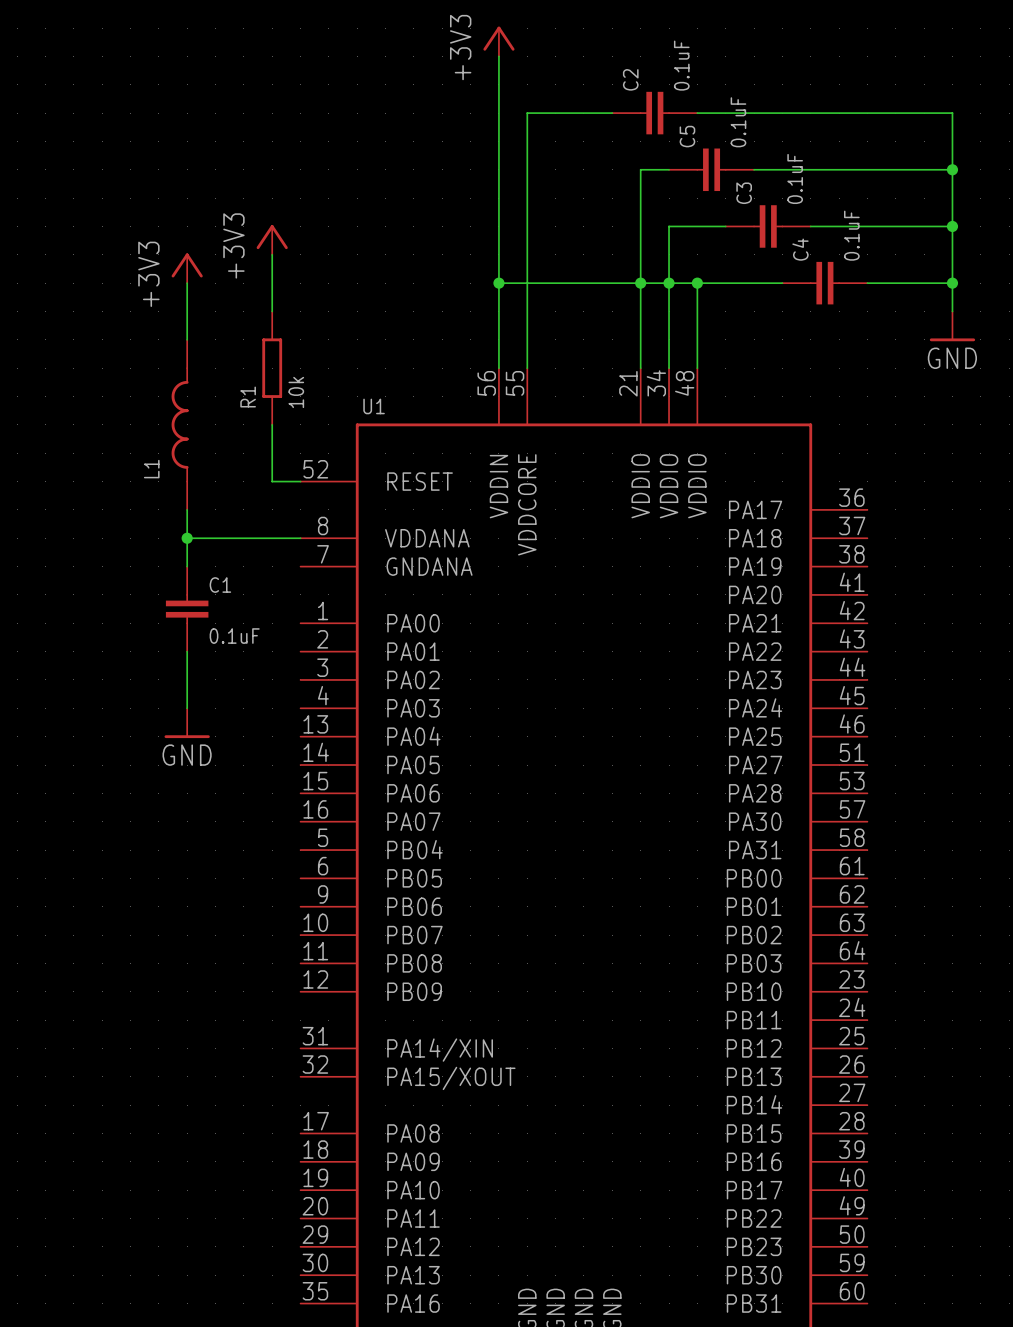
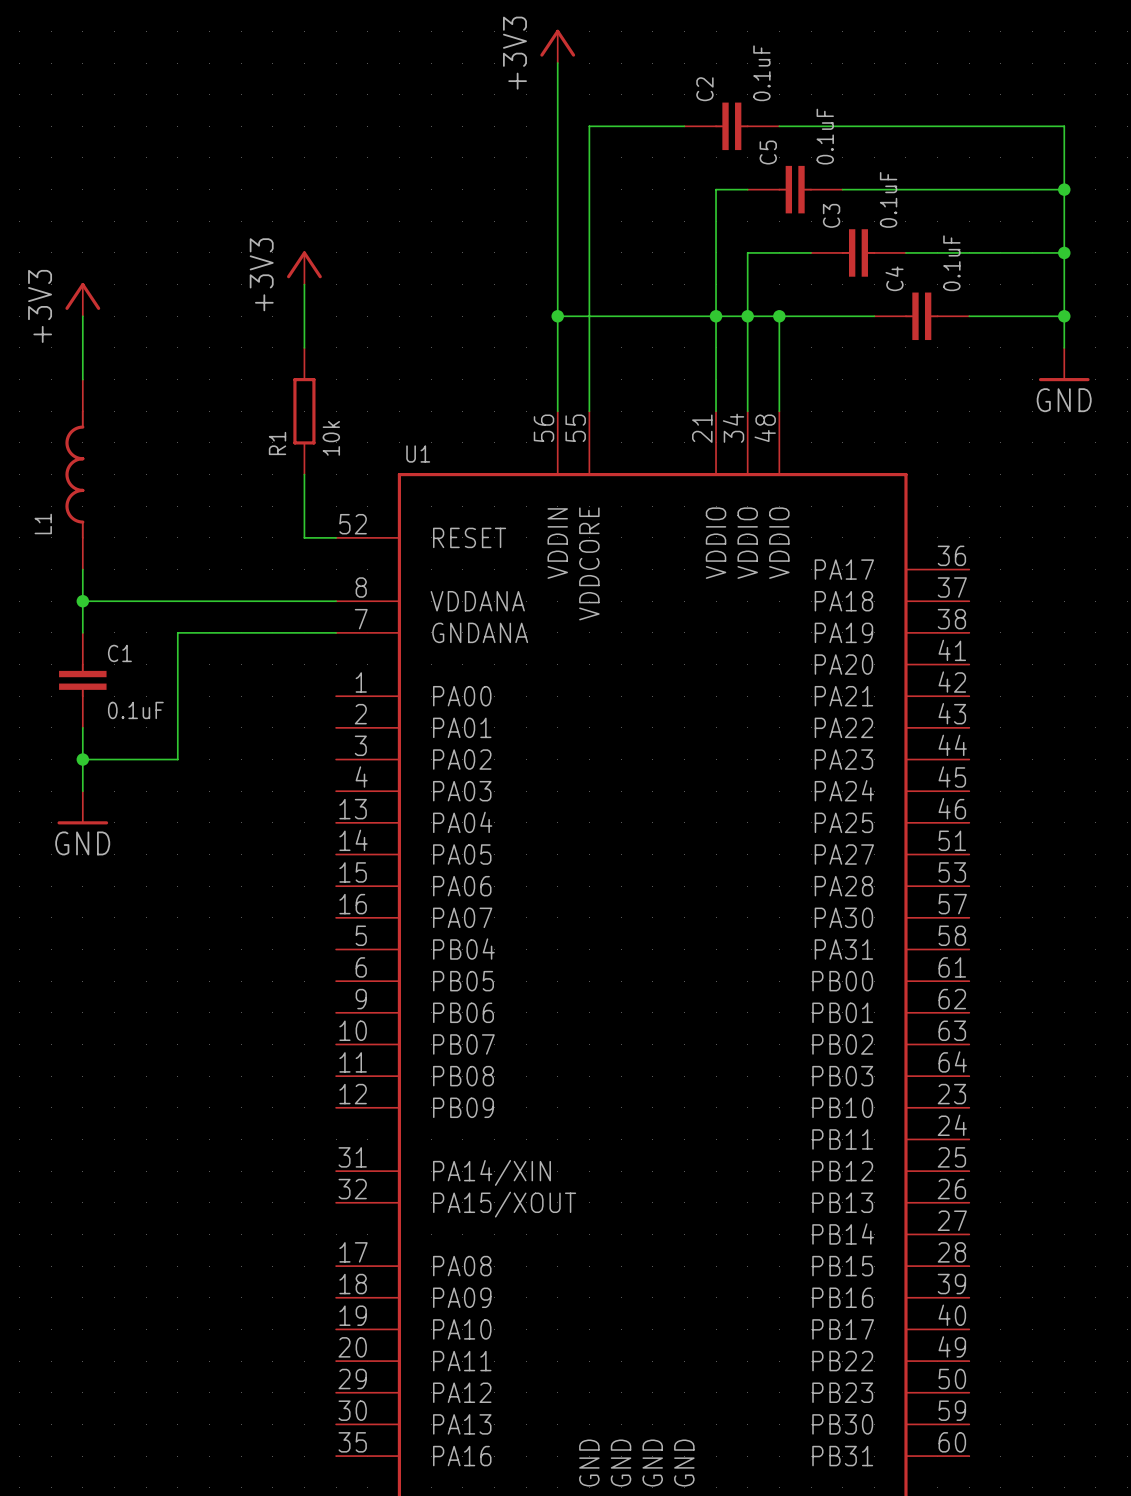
power symbol position: +3V3 (187, 268) -> +3V3 (82, 299)
wire: (187, 283) (187, 339) -> (82, 316) (82, 379)
L1 position: (180, 424) -> (74, 474)
wire: (187, 509) (187, 566) -> (82, 569) (82, 632)
wire: none -> (82, 601) (209, 601)
junction: none -> (82, 601)
junction: (187, 538) -> none
wire: none -> (336, 632) (177, 632) (177, 759) (82, 759)
C1 position: (187, 609) -> (82, 680)
wire: (187, 651) (187, 708) -> (82, 727) (82, 791)
junction: none -> (82, 759)
power symbol position: GND (187, 723) -> GND (82, 807)

